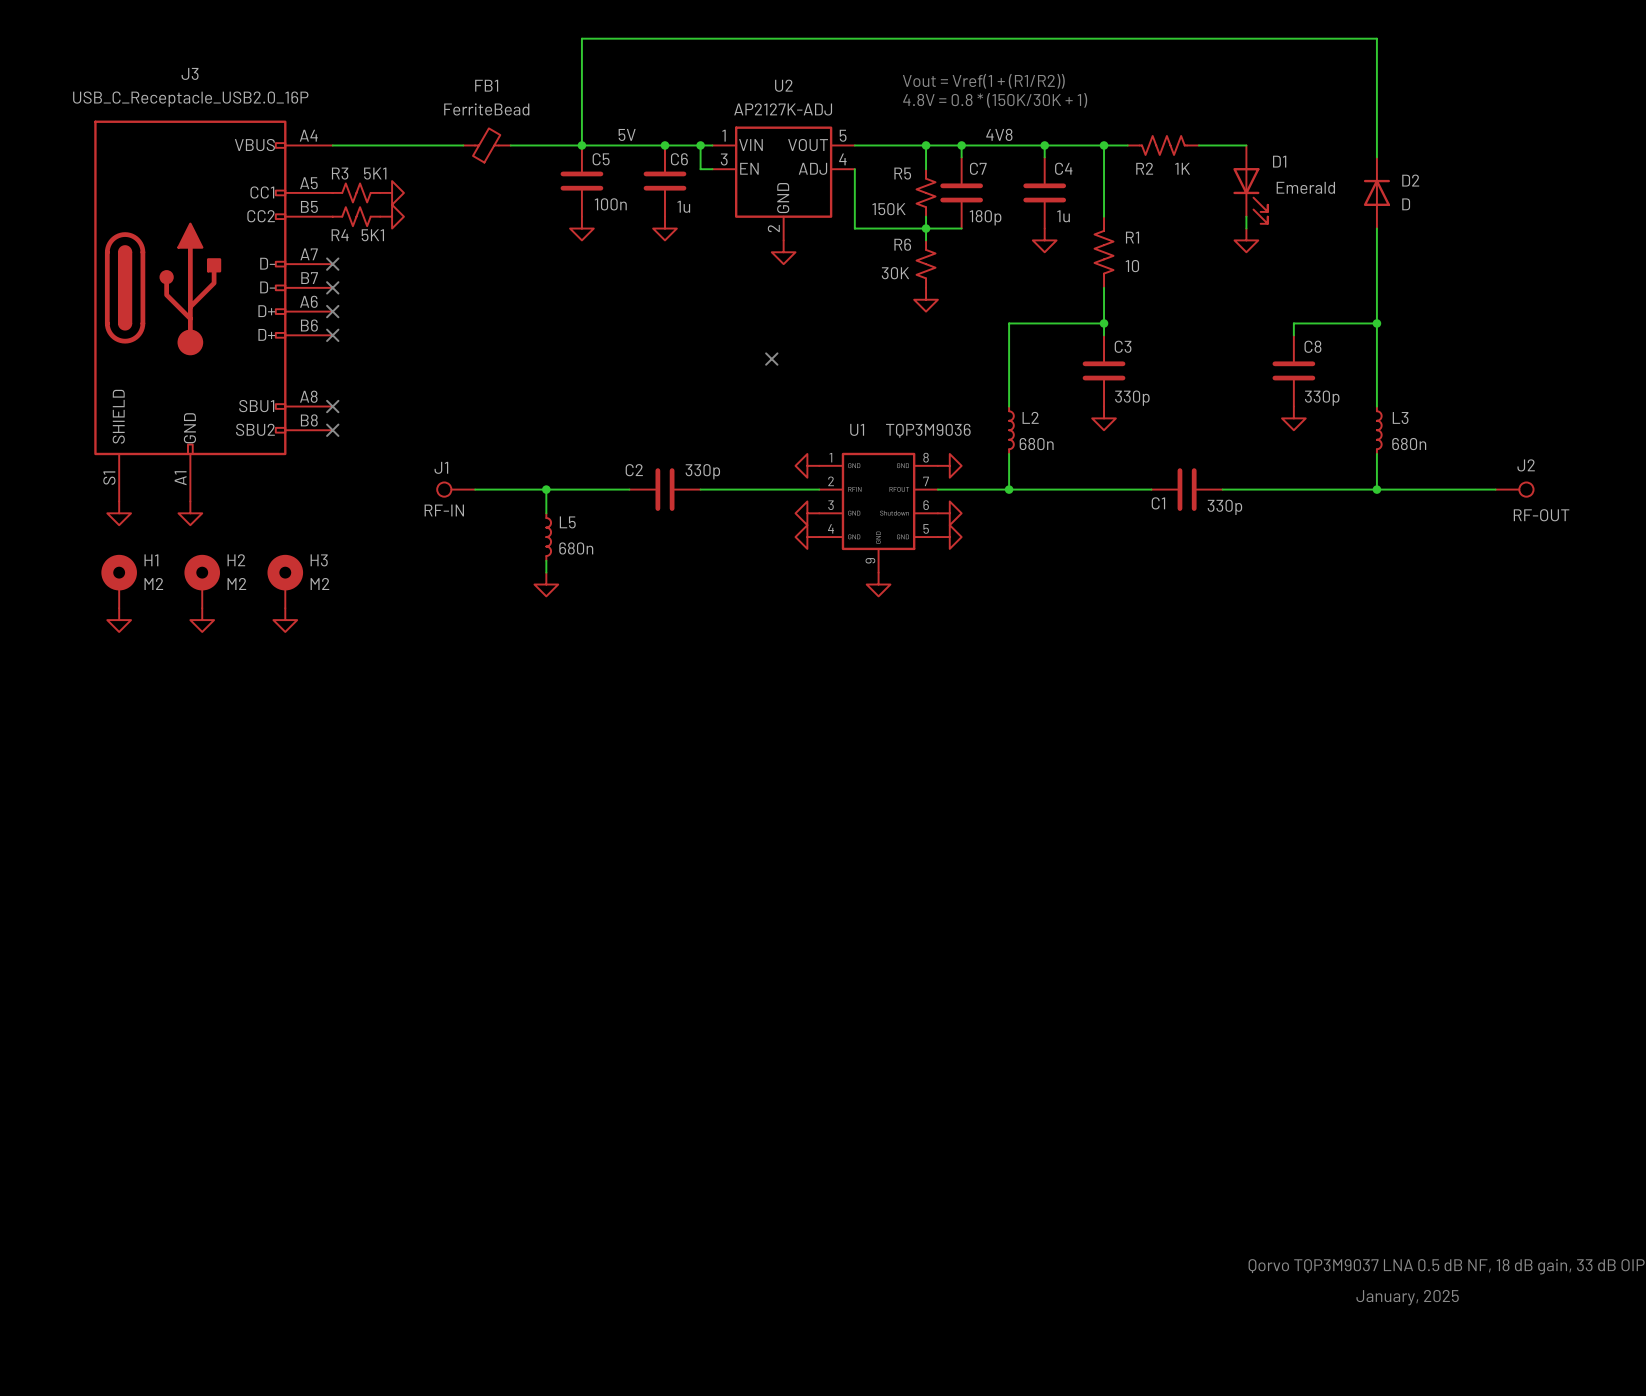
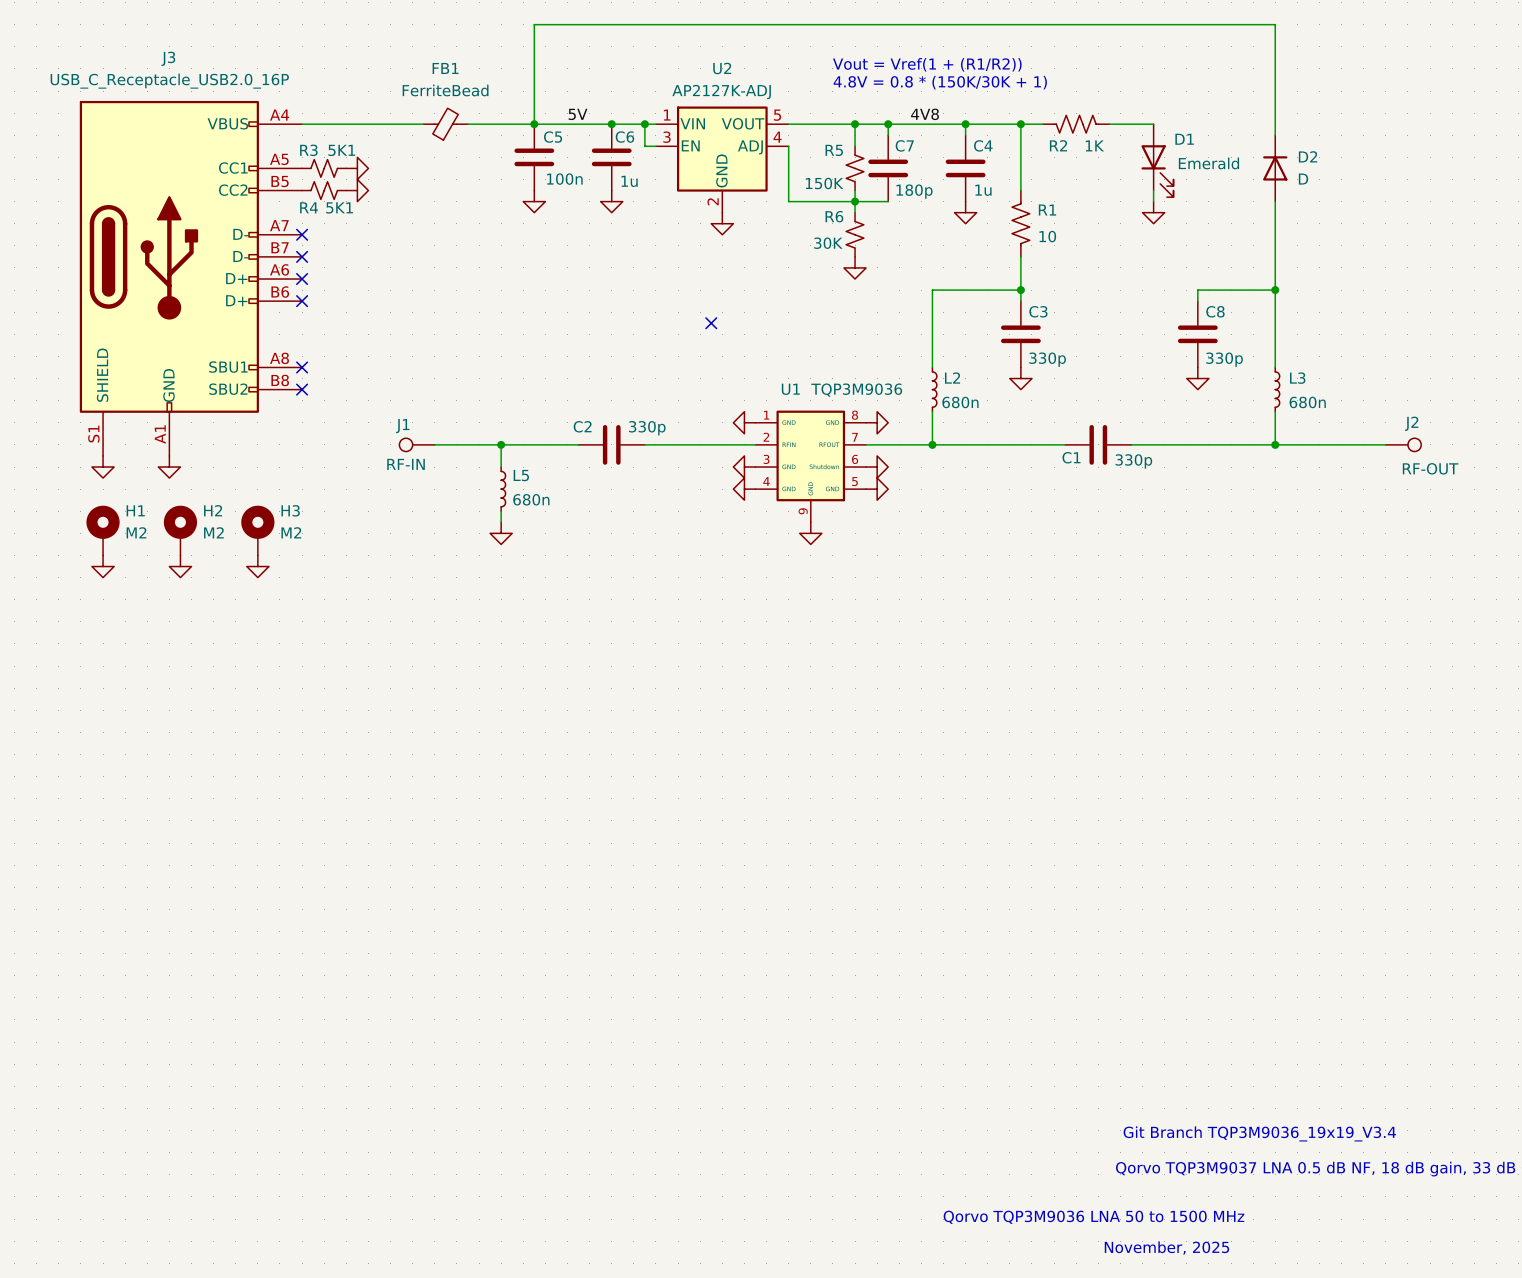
text: none -> Git Branch TQP3M9036_19x19_V3.4 (1259, 1133)
text: January, 2025 (1407, 1297) -> none
text: none -> Qorvo TQP3M9036 LNA 50 to 1500 MHz (1093, 1217)
text: none -> November, 2025 (1166, 1248)

